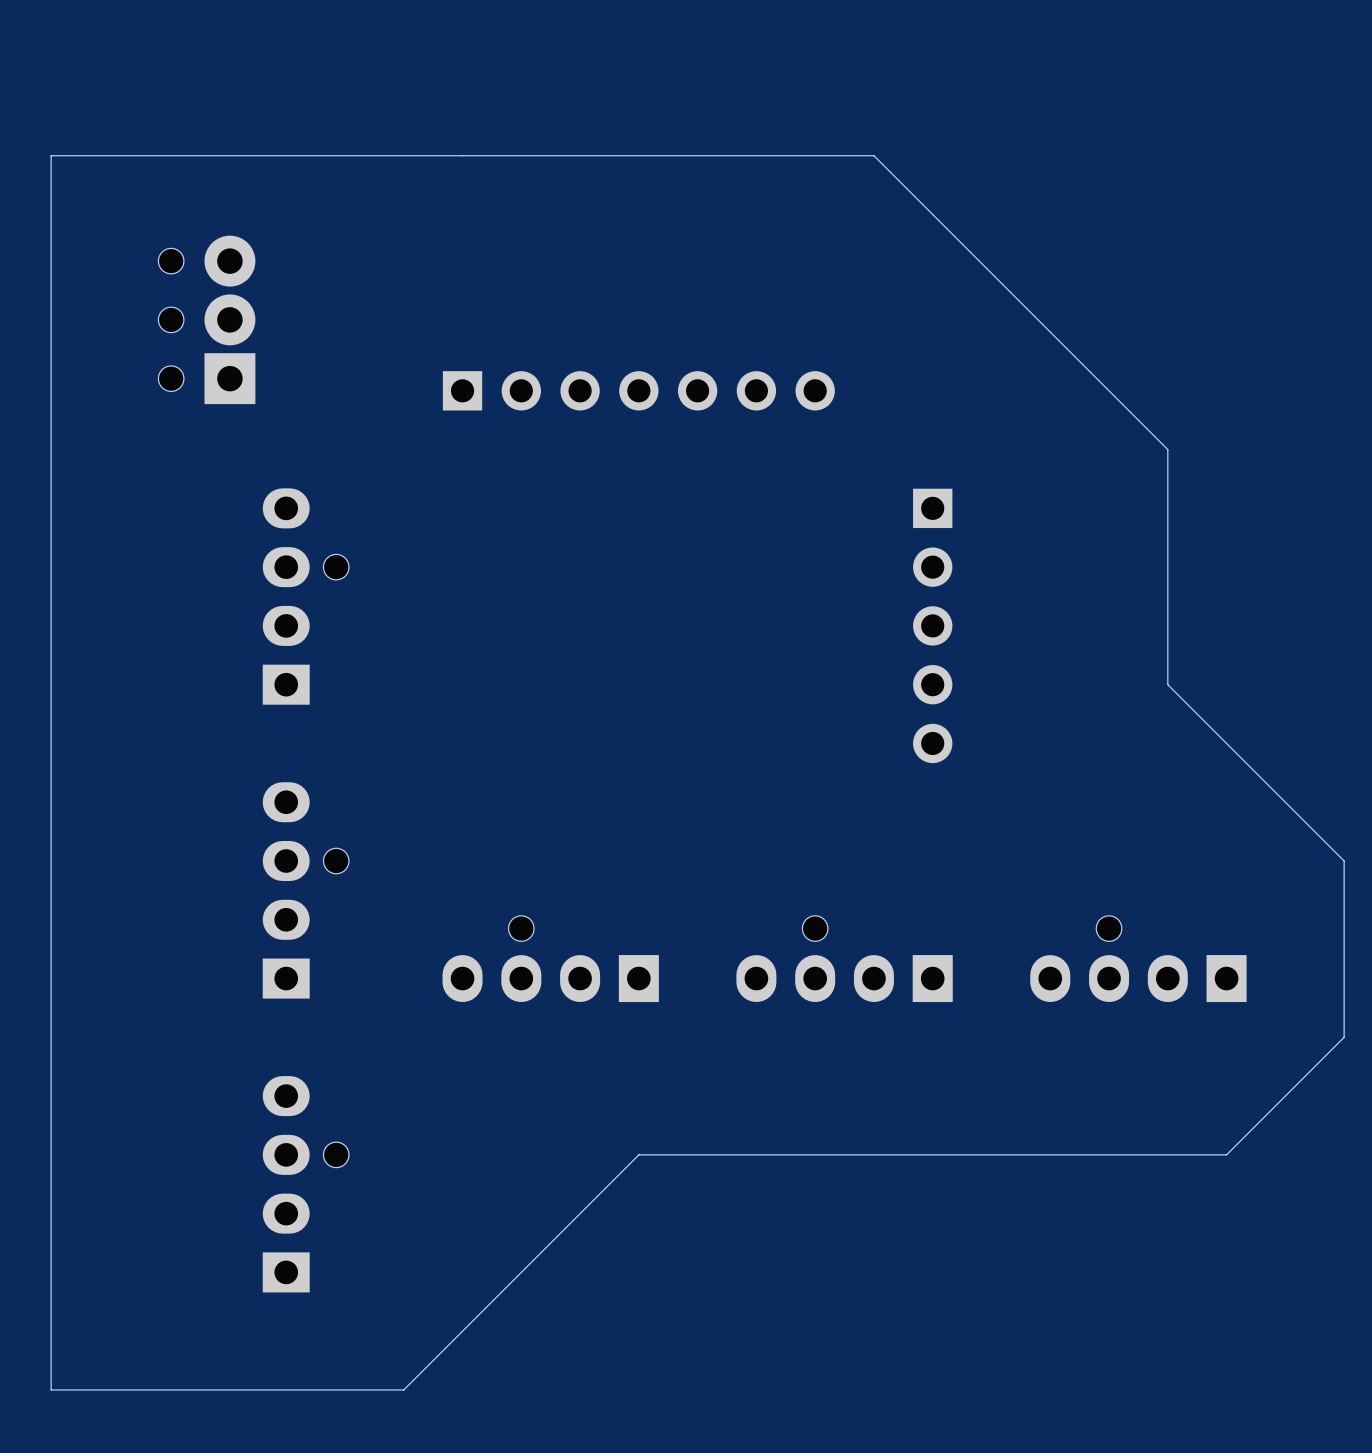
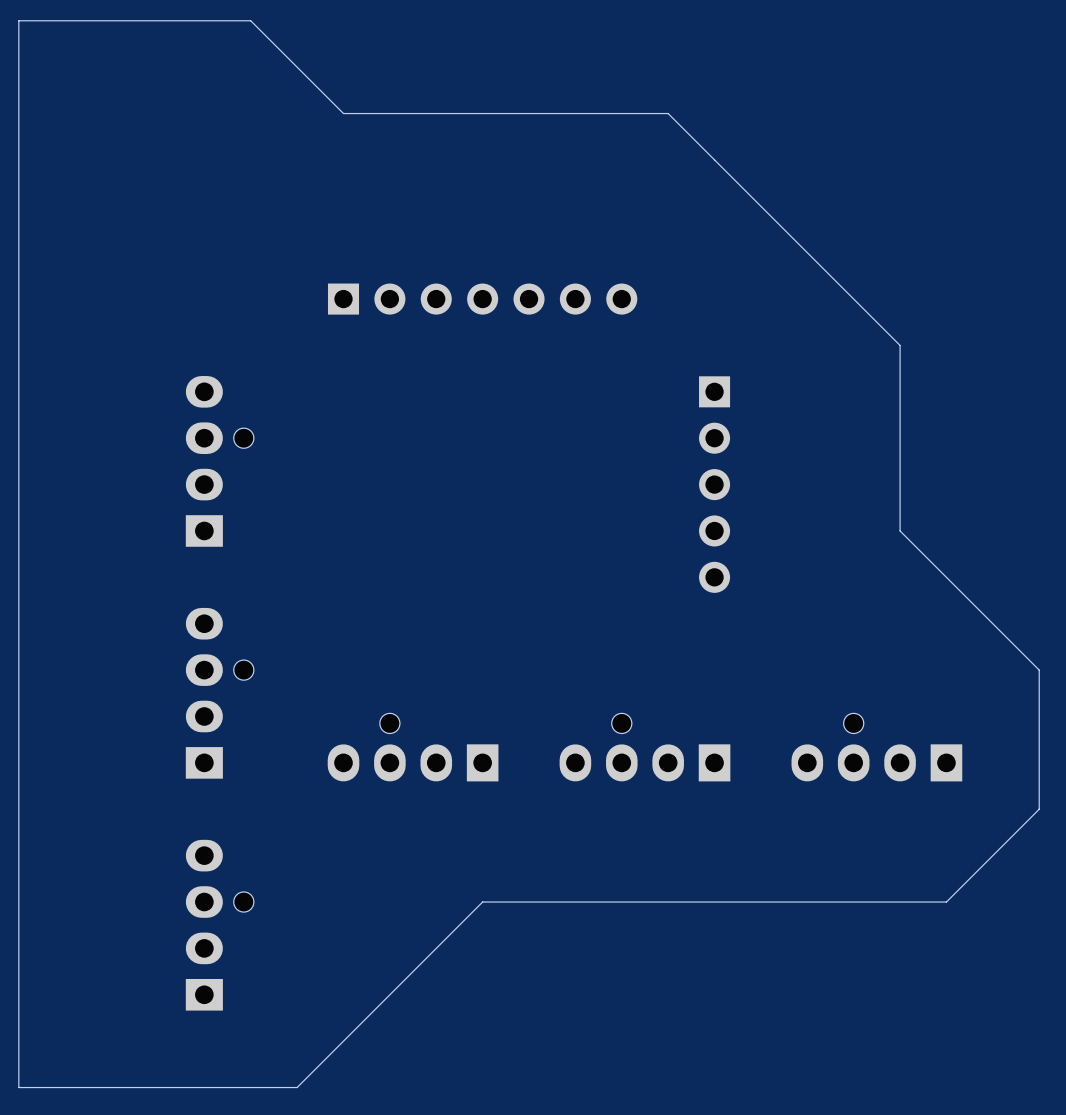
board edge: (462, 155) (51, 155) -> (343, 113) (250, 20) (18, 20) (18, 113)
part: (206, 319) -> none

